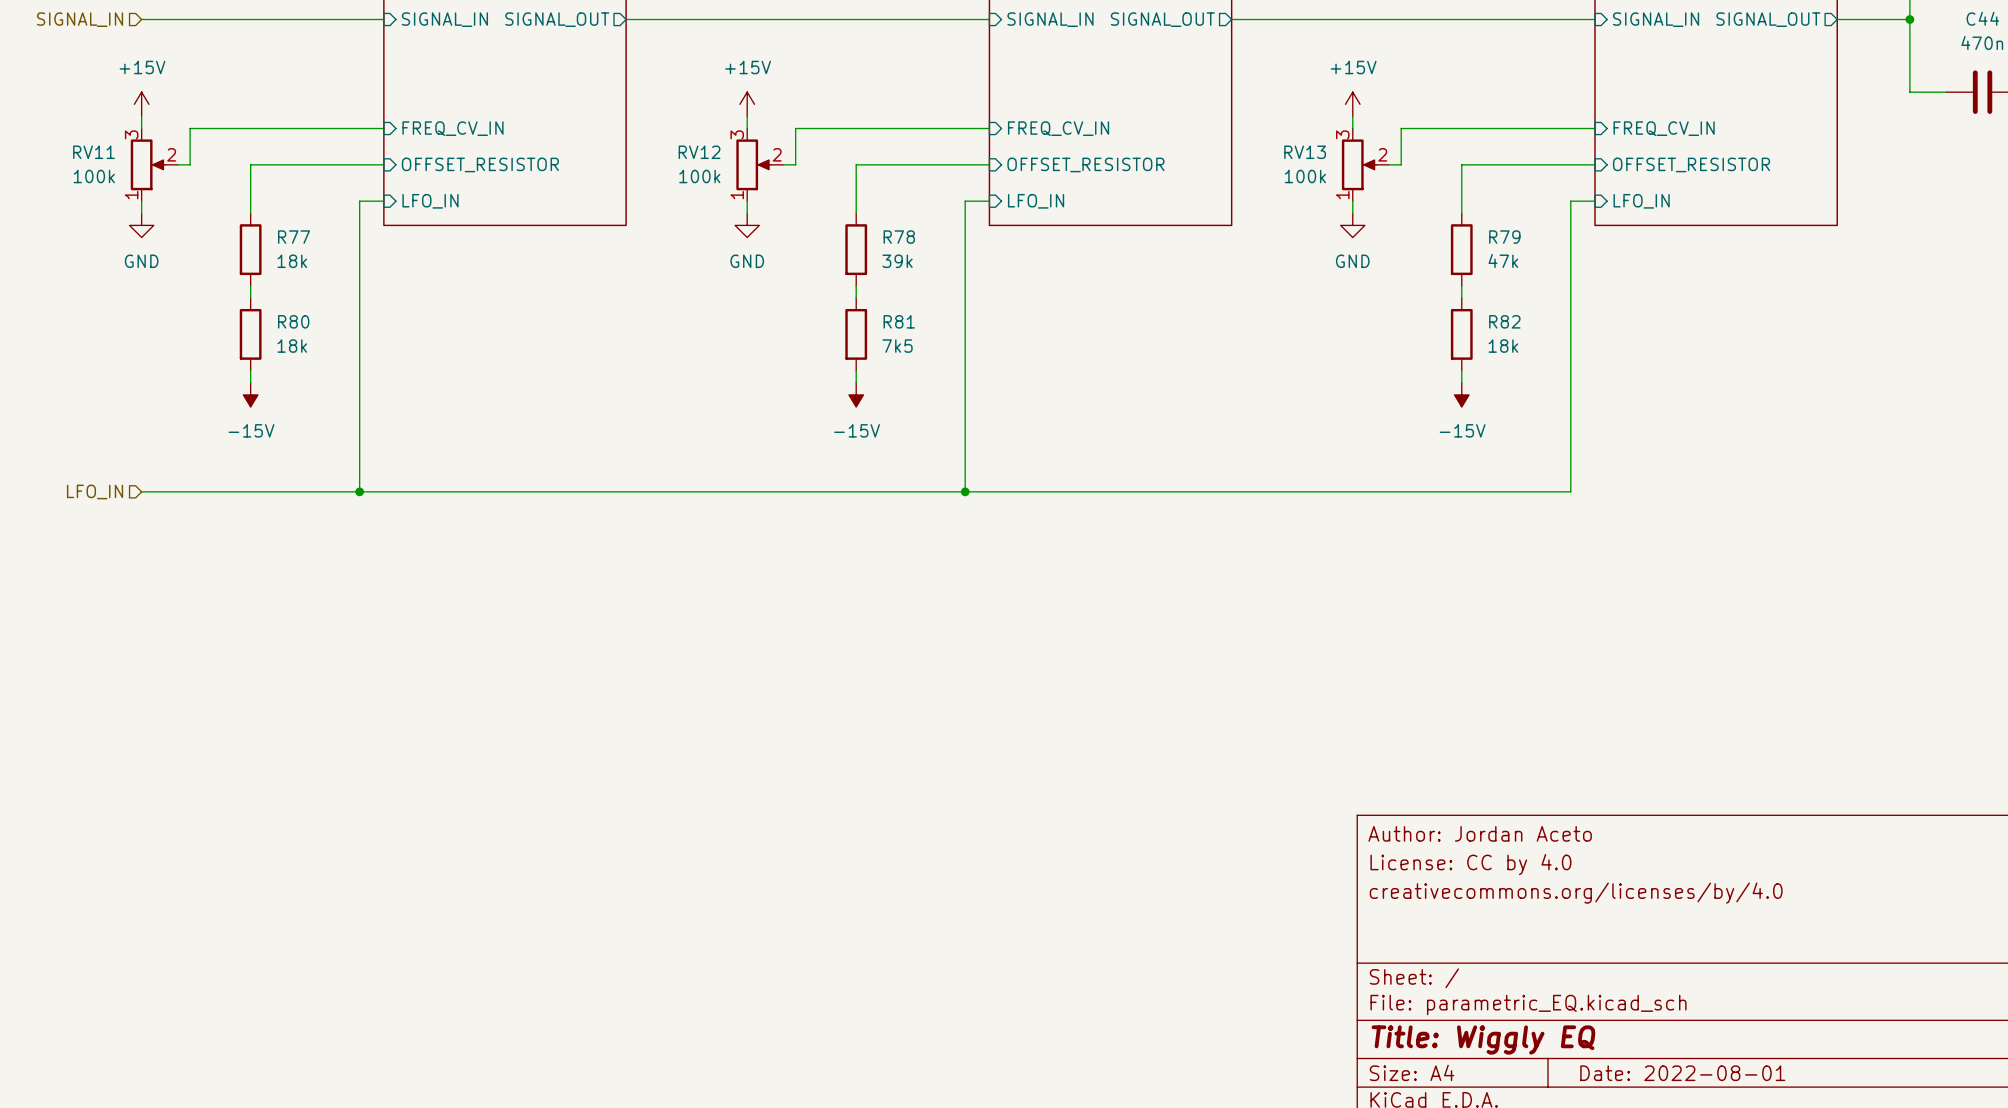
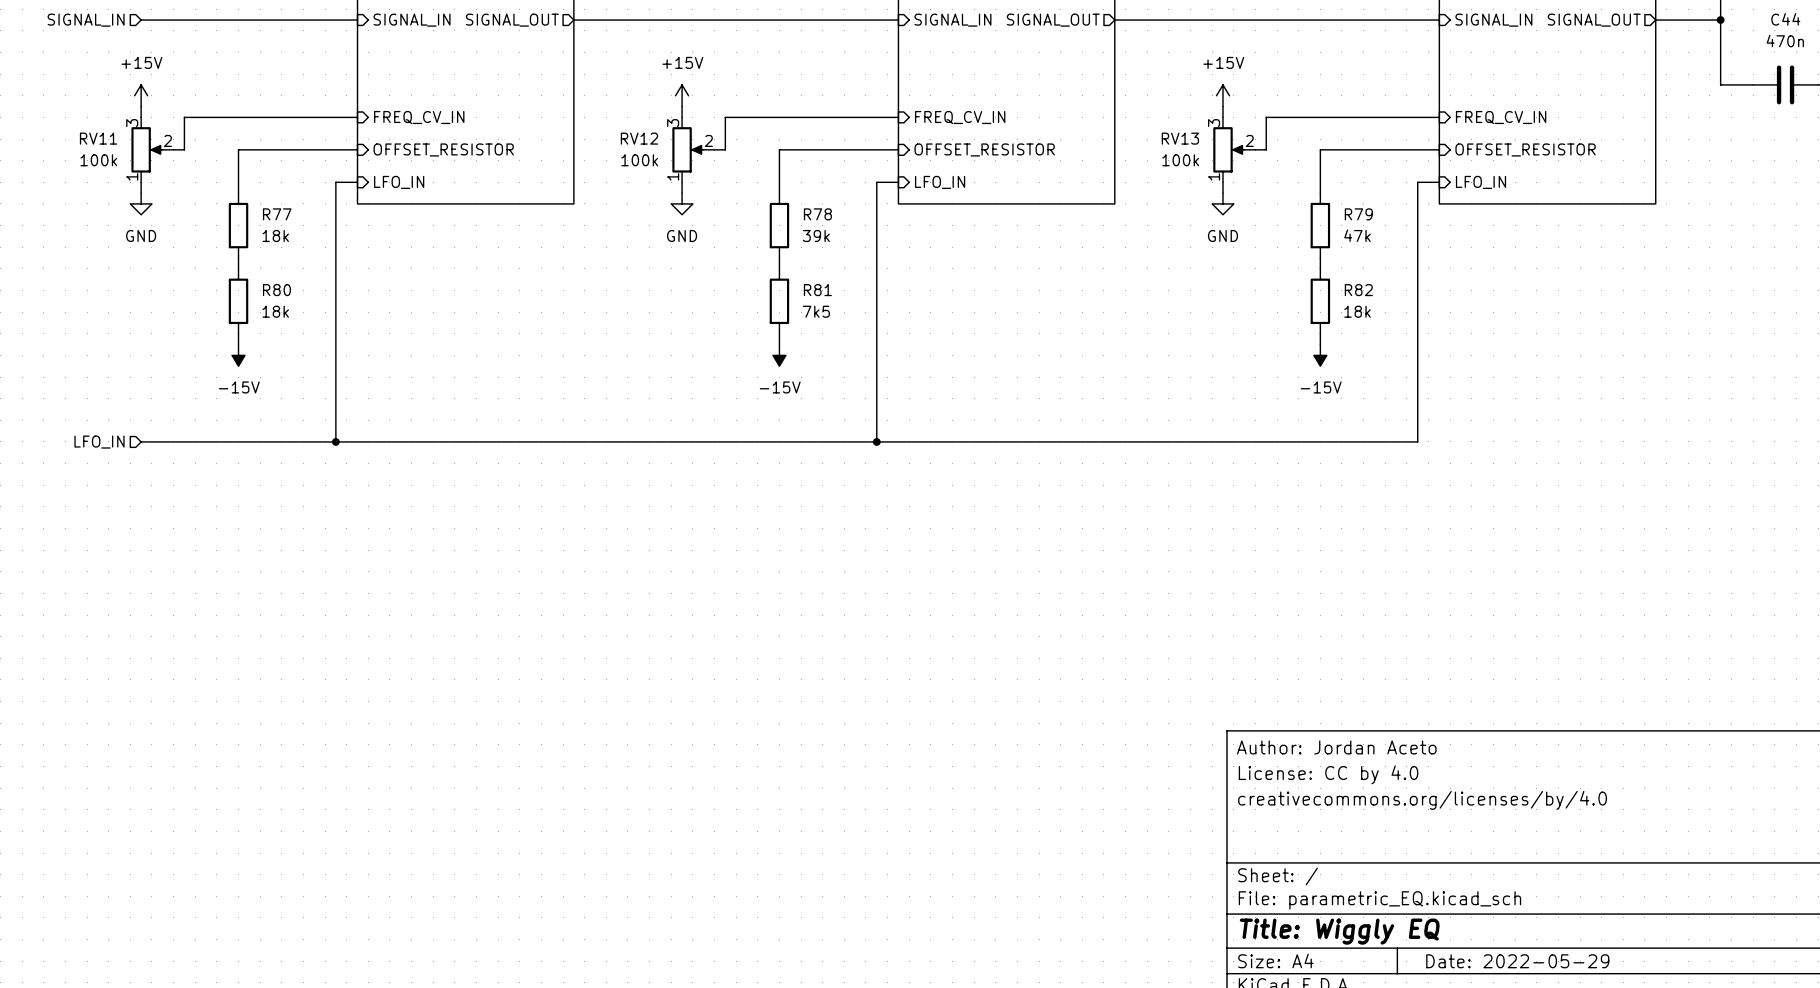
title block: Date: 2022-08-01 (1682, 1073) -> Date: 2022-05-29 (1517, 961)

